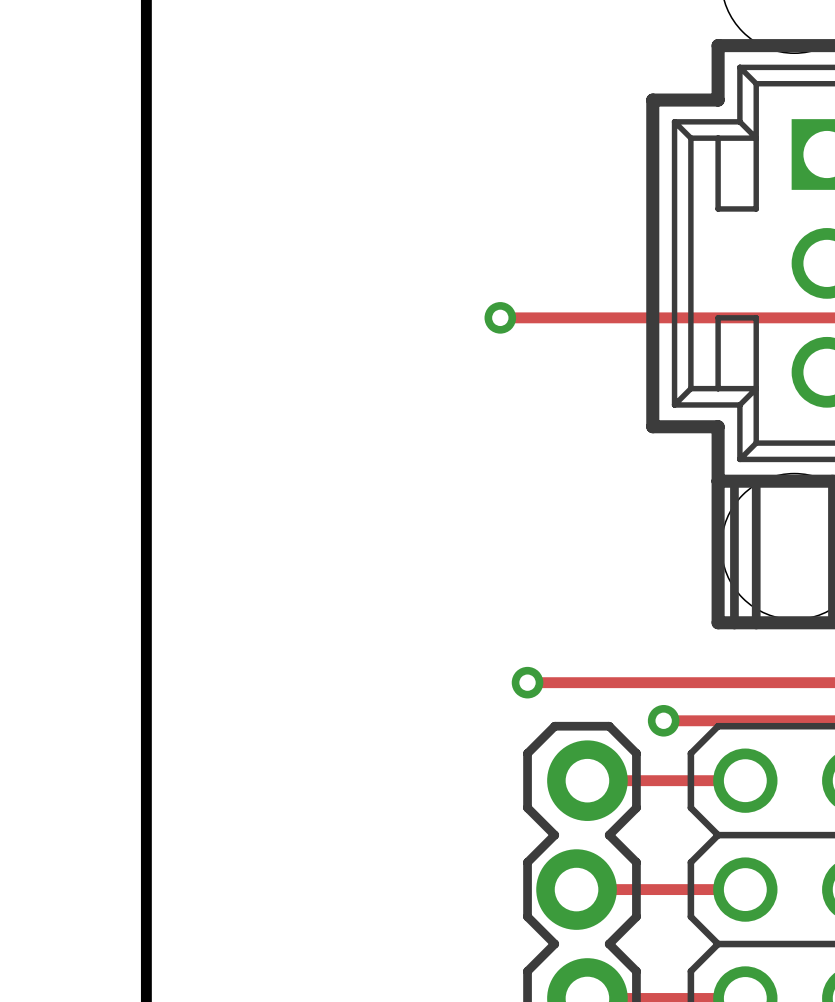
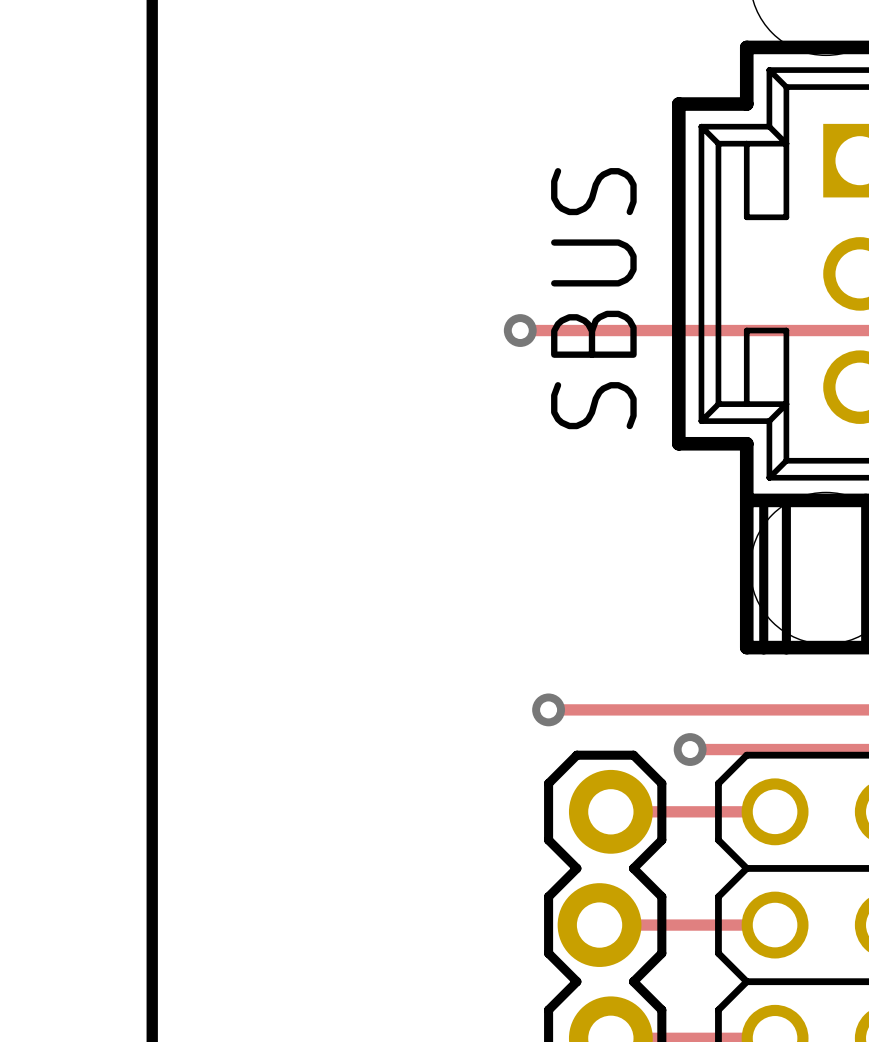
text: none -> SBUS (593, 298)

